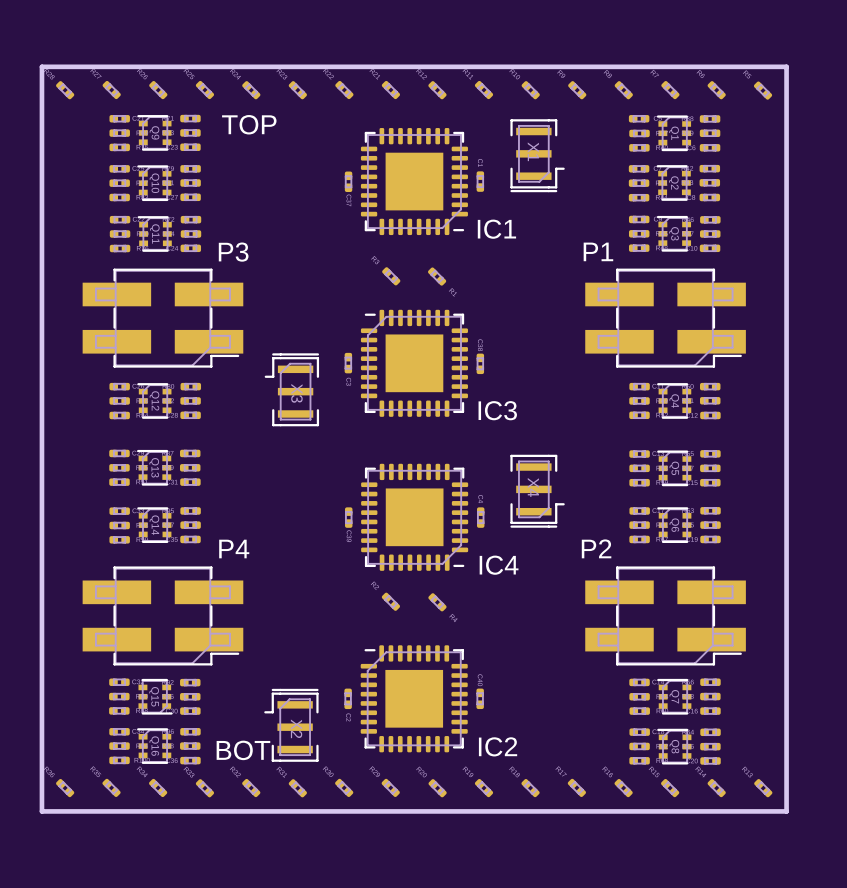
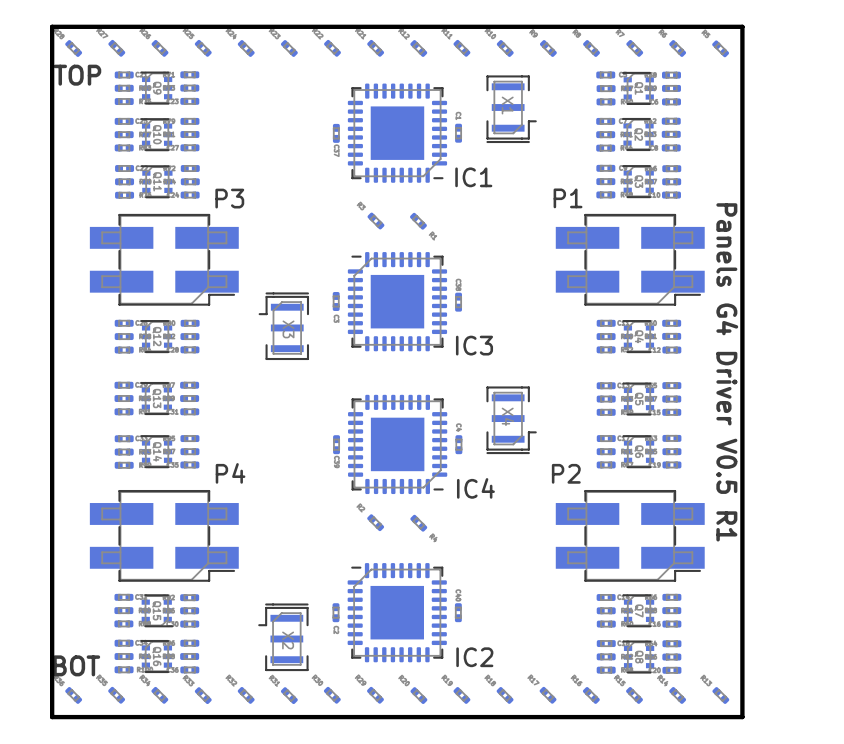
text position: TOP (249, 124) -> TOP (77, 75)
text: none -> Panels G4 Driver V0.5 R1 (727, 372)
text position: BOT (243, 750) -> BOT (76, 665)

